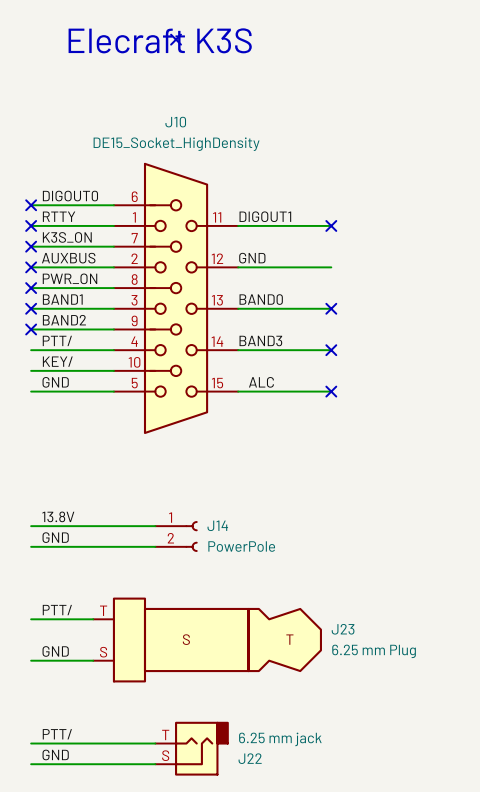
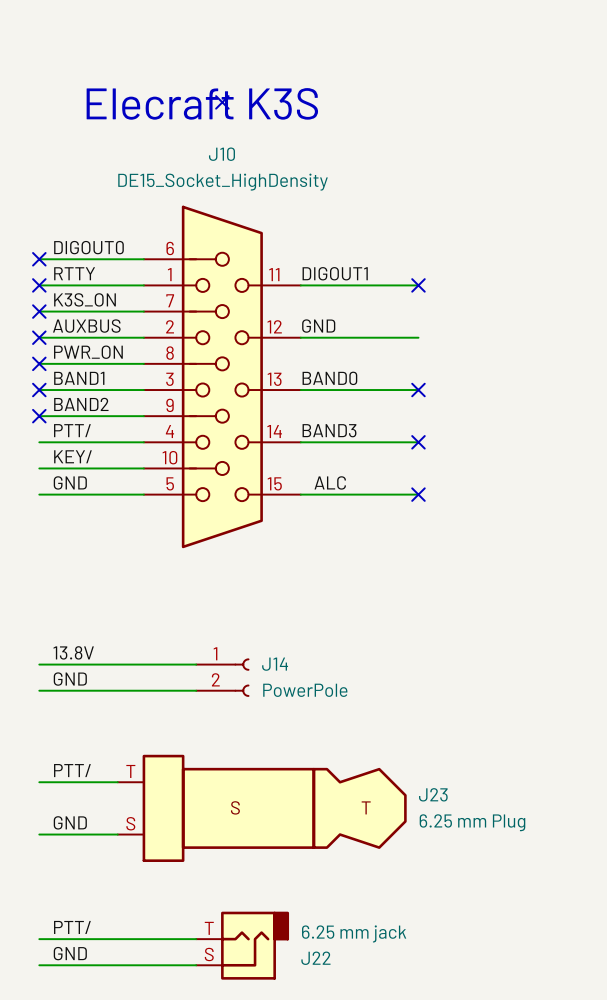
no-connect mark position: (176, 39) -> (222, 102)
text position: Elecraft K3S (160, 40) -> Elecraft K3S (202, 103)

